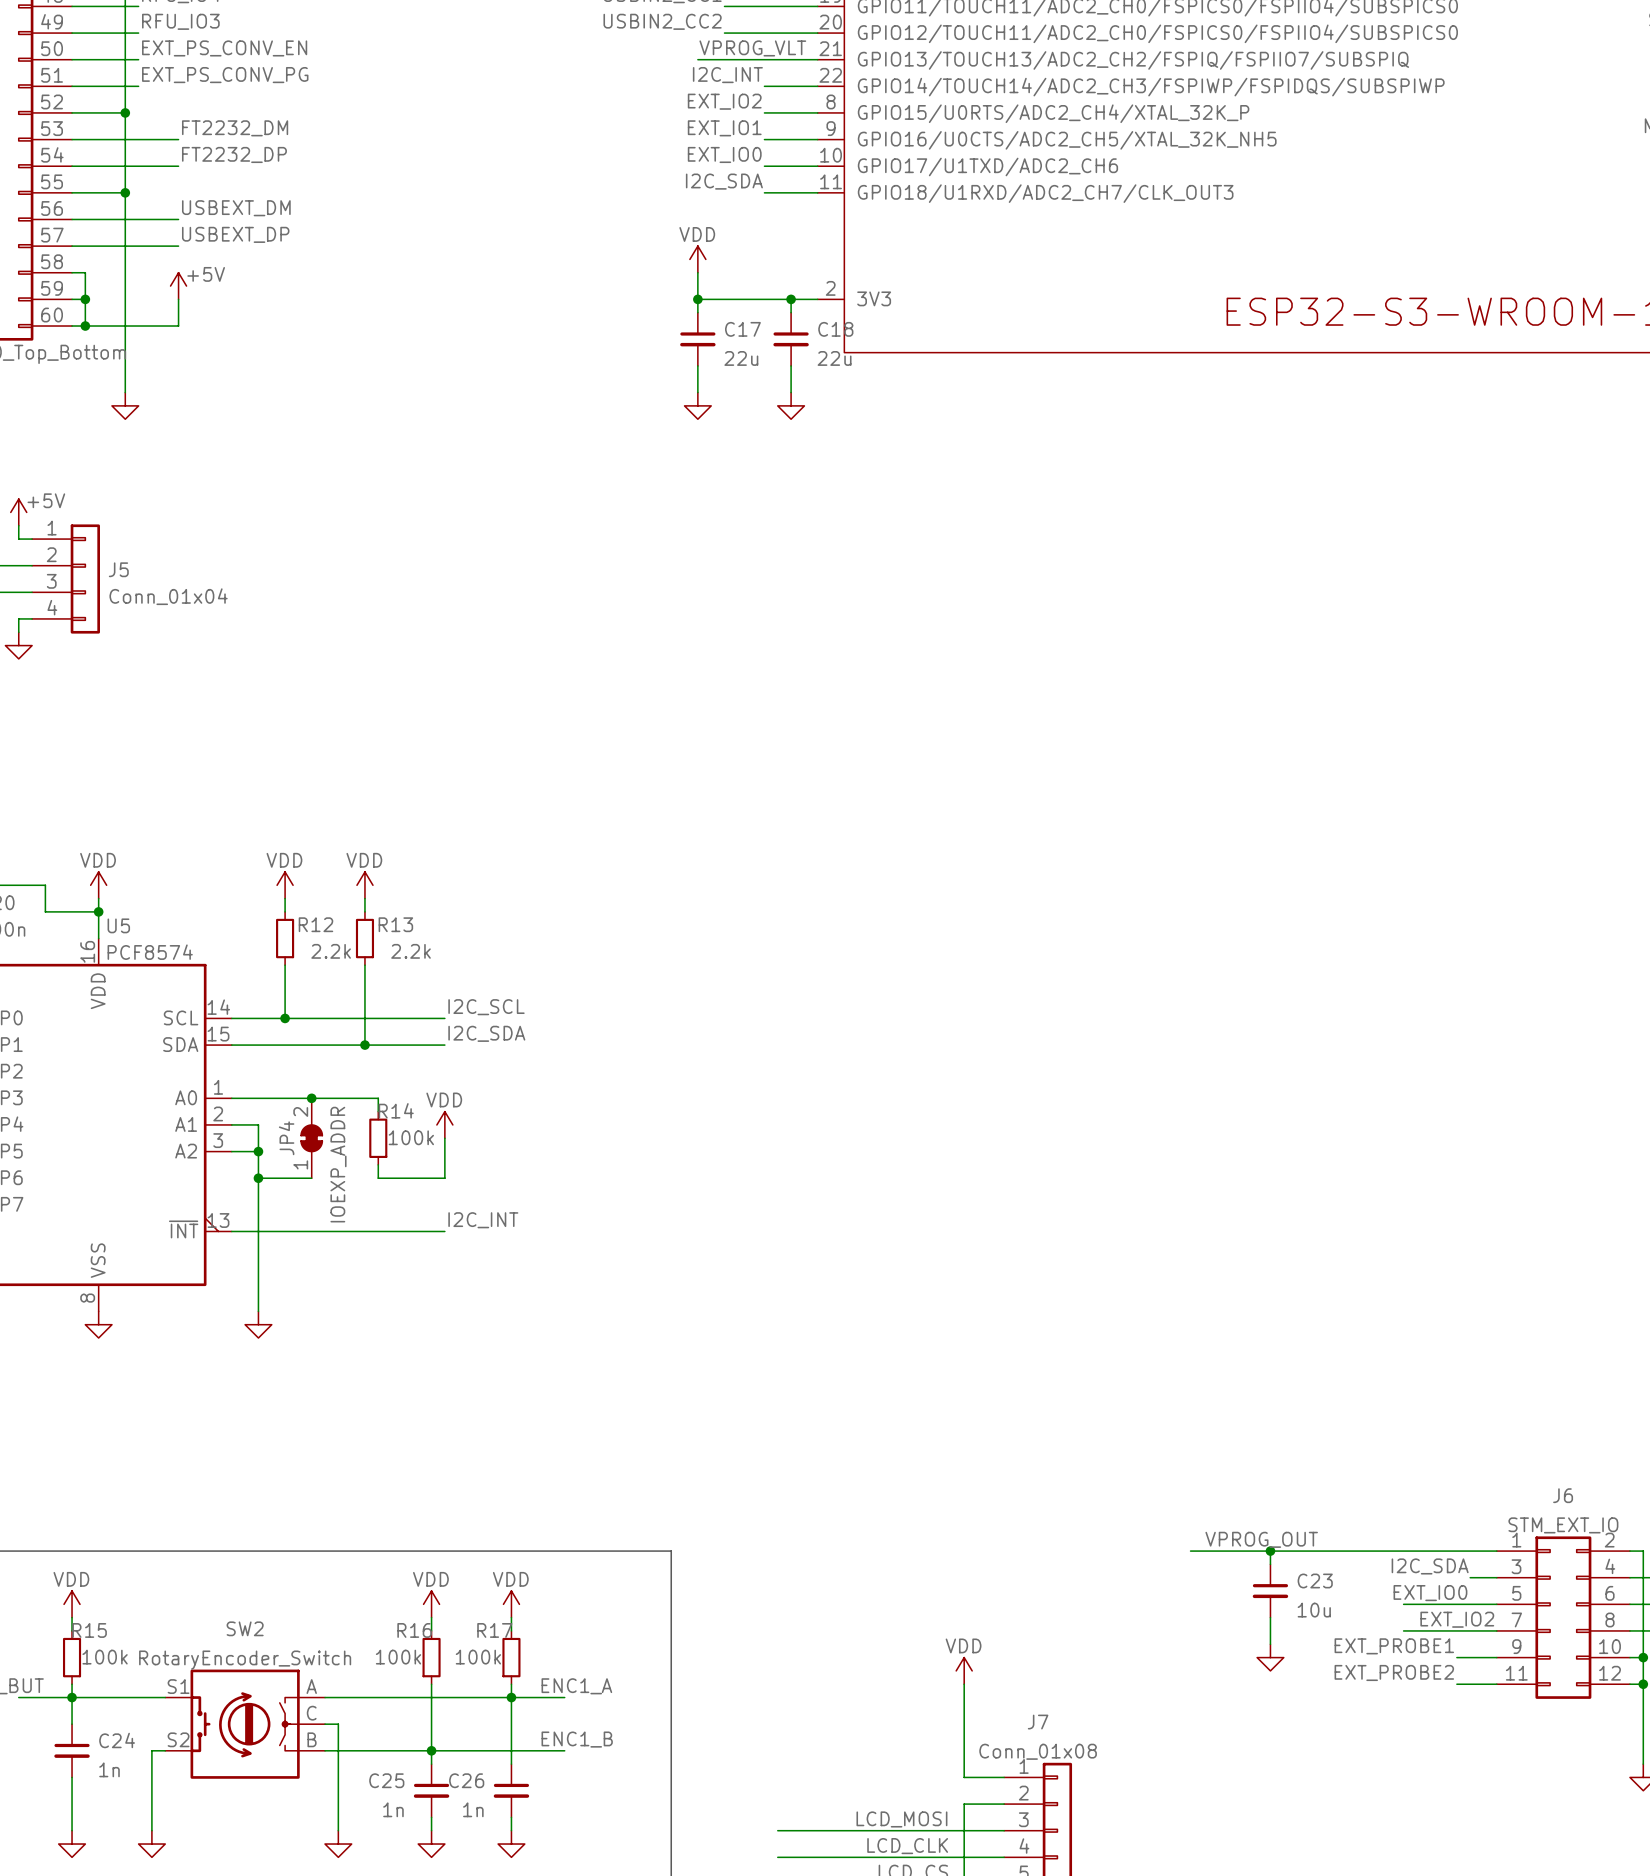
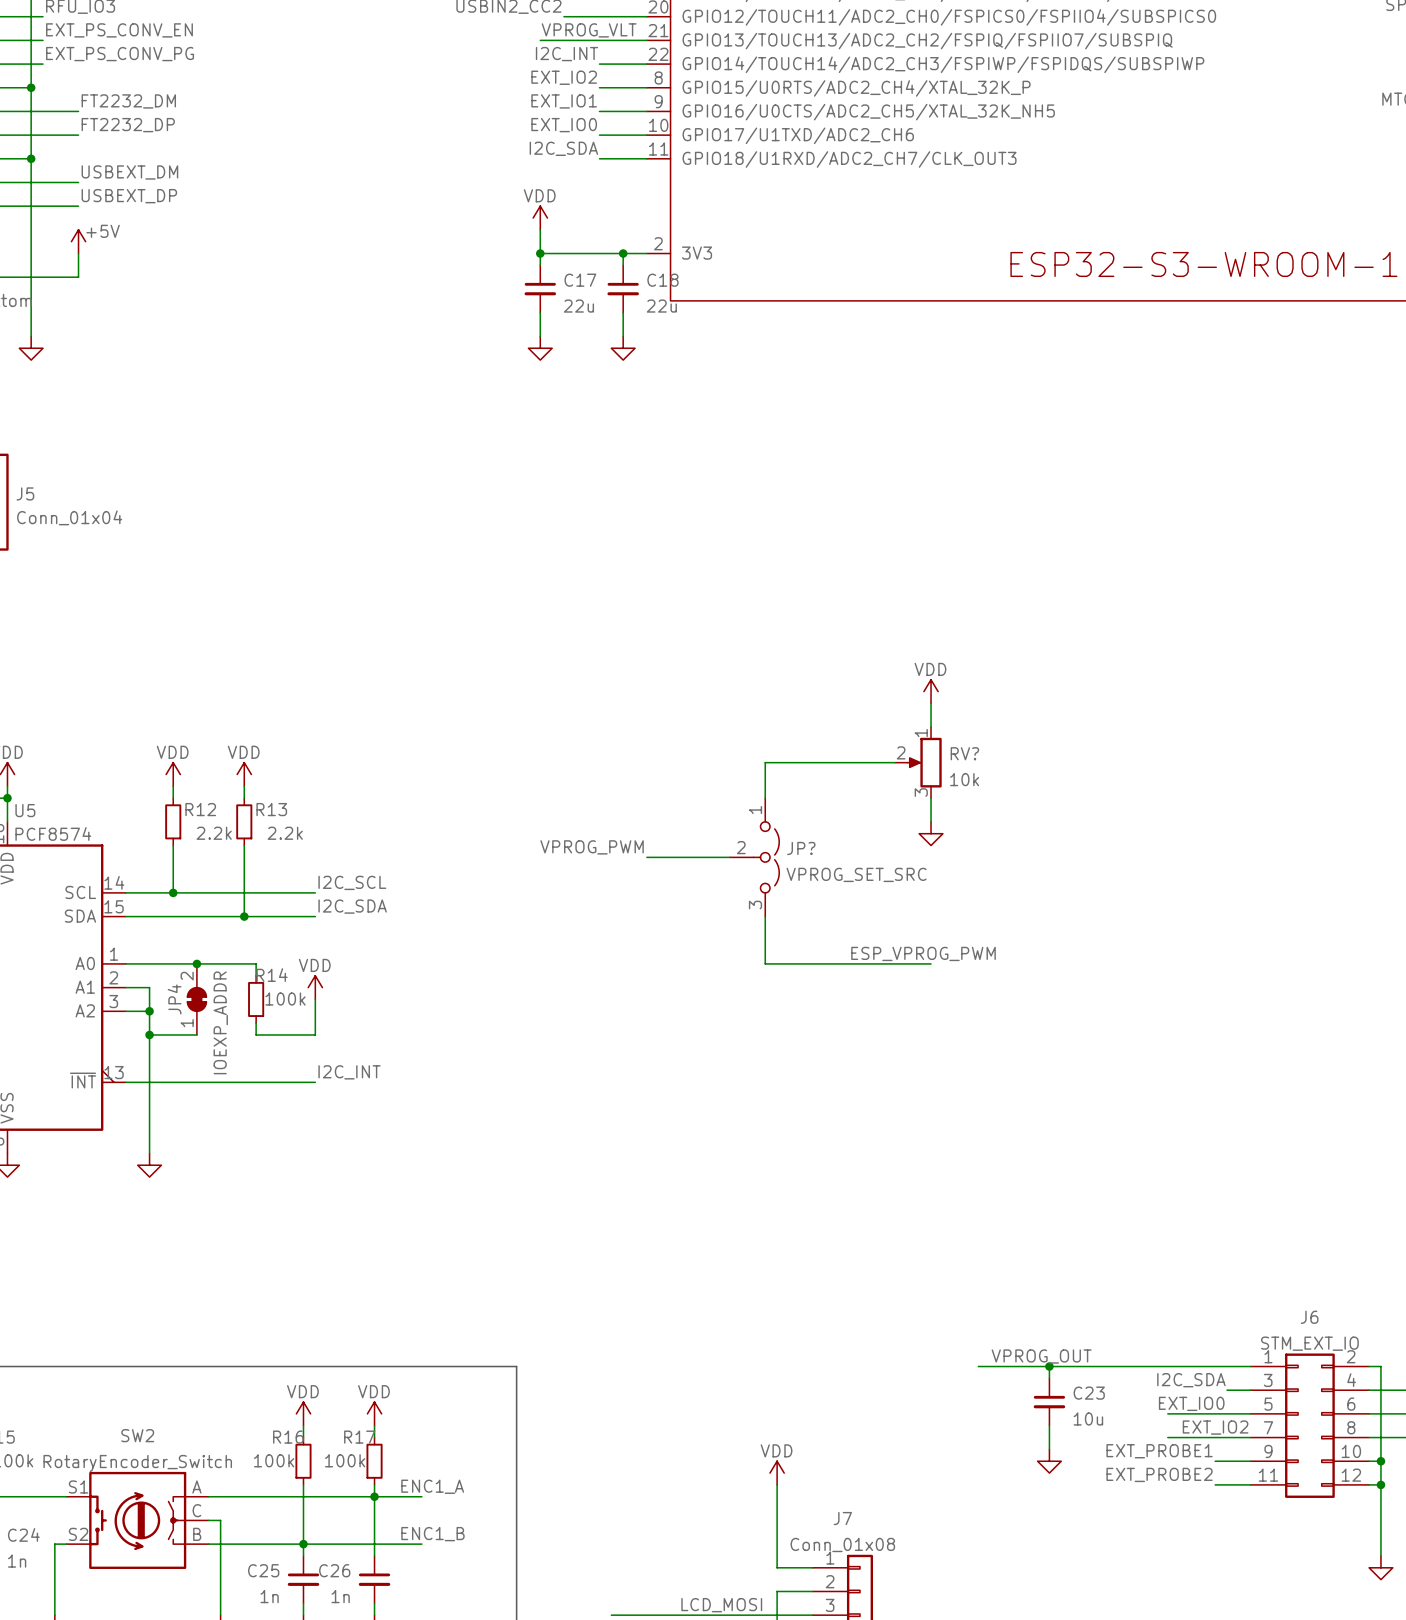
power symbol: none -> VDD (931, 691)
wire: none -> (931, 703) (931, 727)
wire: none -> (895, 762) (765, 762) (765, 798)
RV?: none -> 10k (918, 762)
wire: none -> (931, 798) (931, 821)
power symbol: none -> (931, 833)
label: none -> VPROG_PWM (592, 847)
wire: none -> (646, 857) (729, 857)
JP?: none -> VPROG_SET_SRC (754, 857)
wire: none -> (765, 916) (765, 963) (931, 963)
label: none -> ESP_VPROG_PWM (923, 953)

